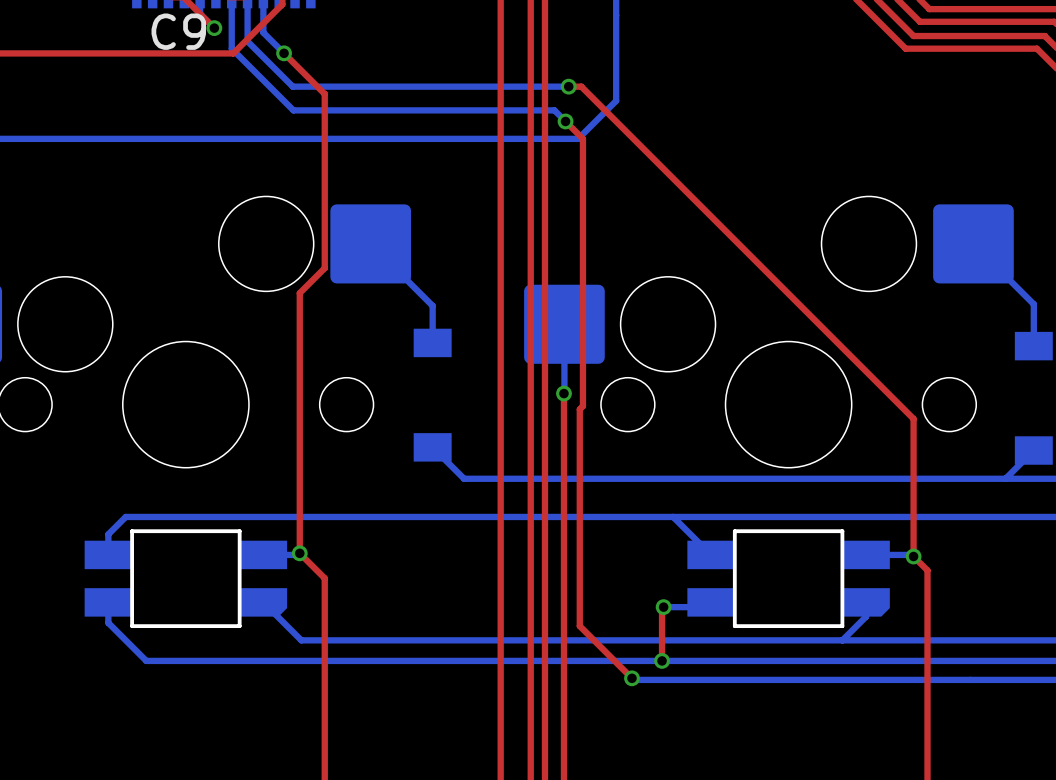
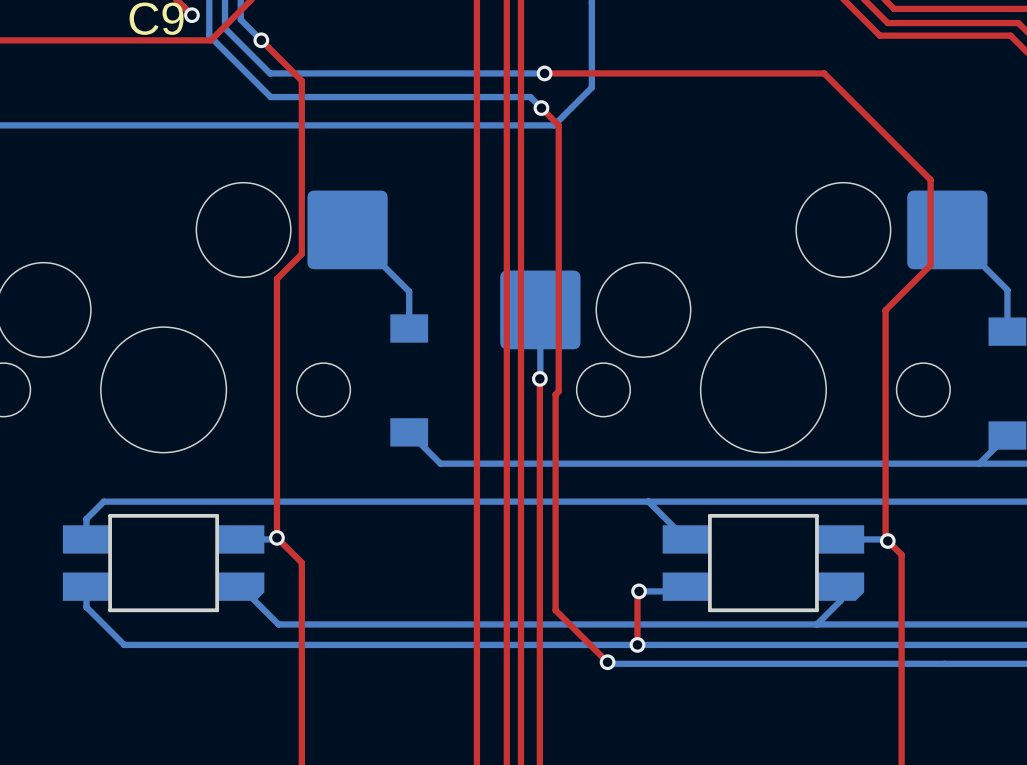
top track: (581, 86) (913, 418) (913, 556) -> (557, 73) (824, 73) (930, 179) (930, 265) (885, 310) (885, 538) (887, 541)

